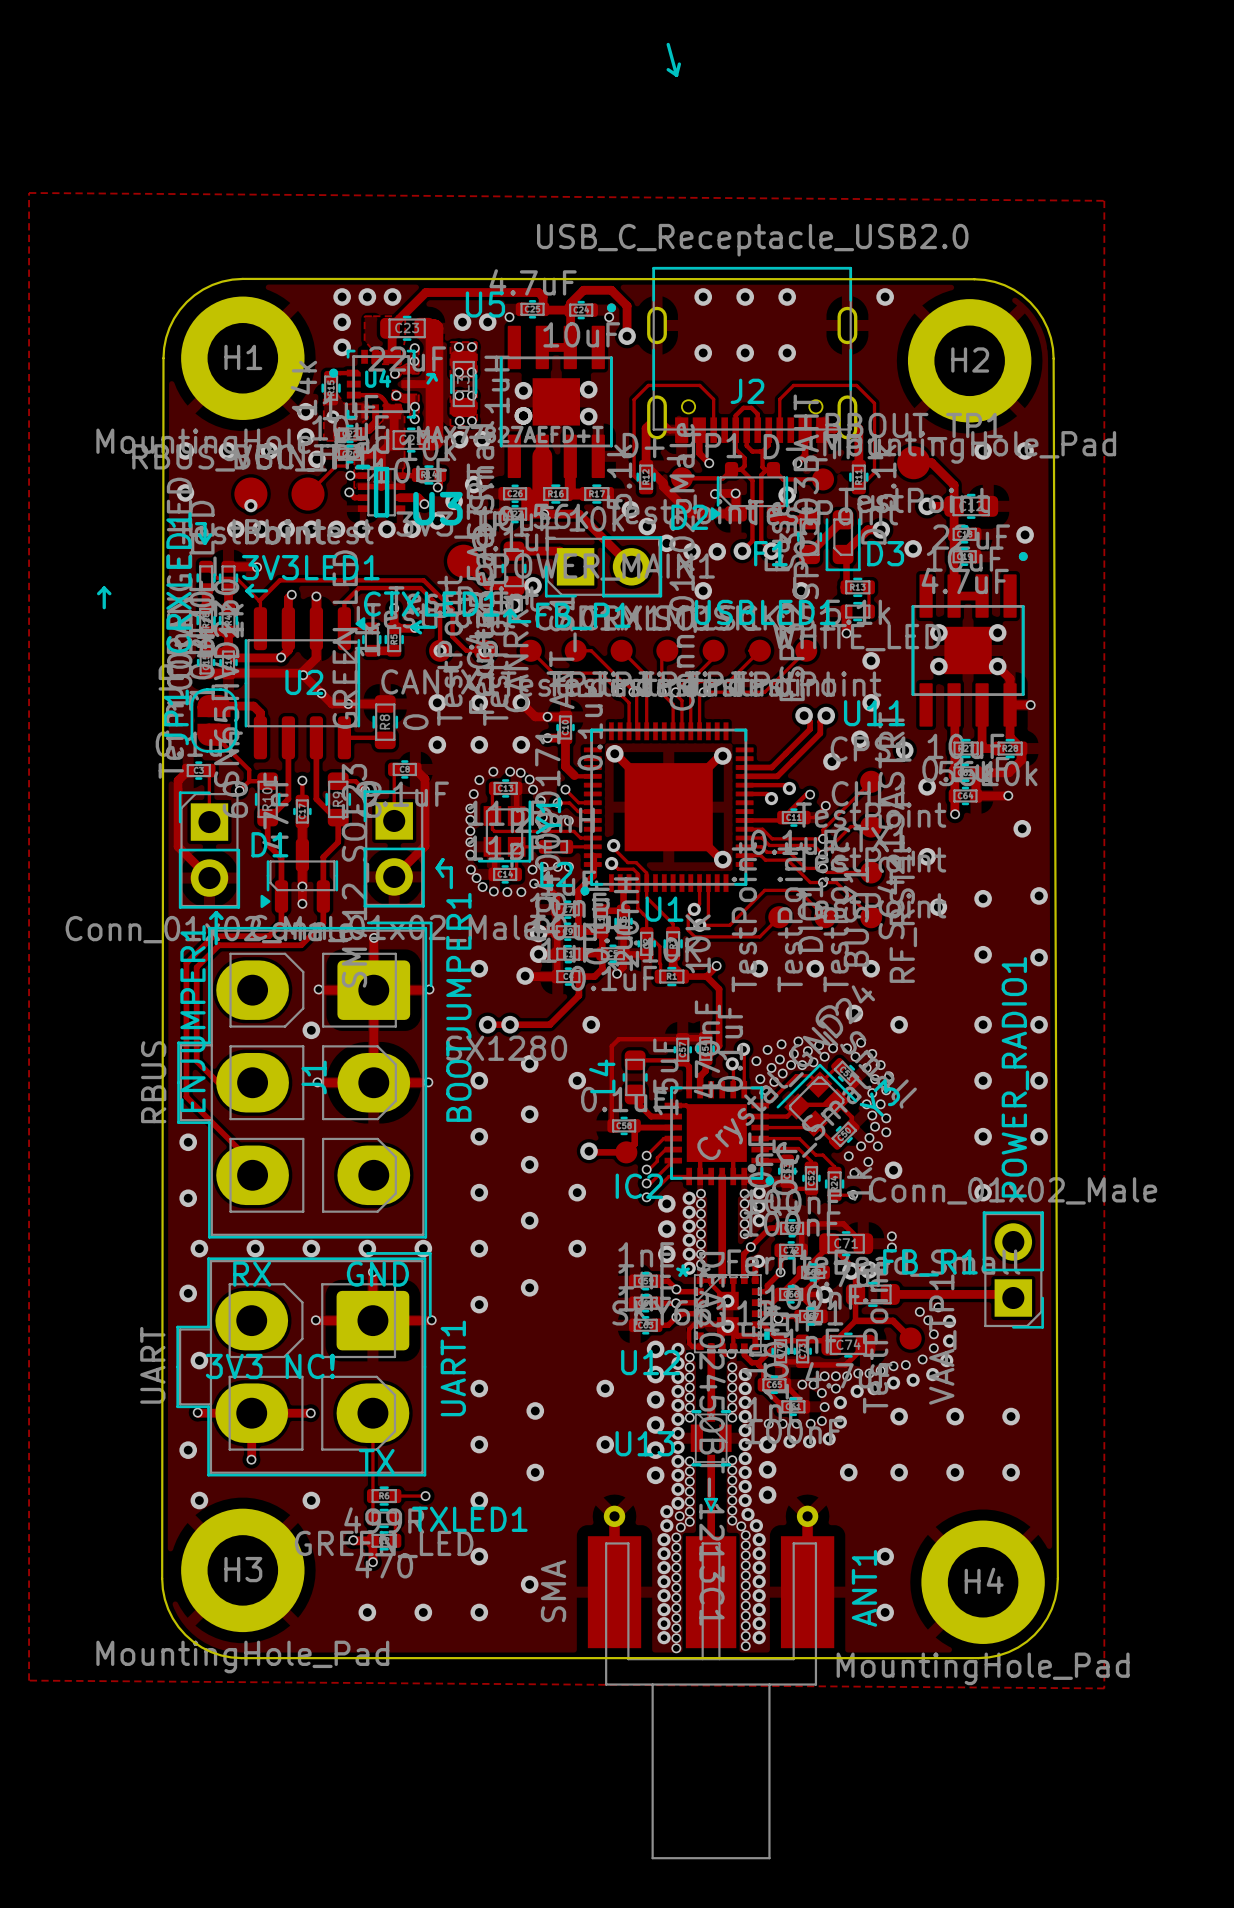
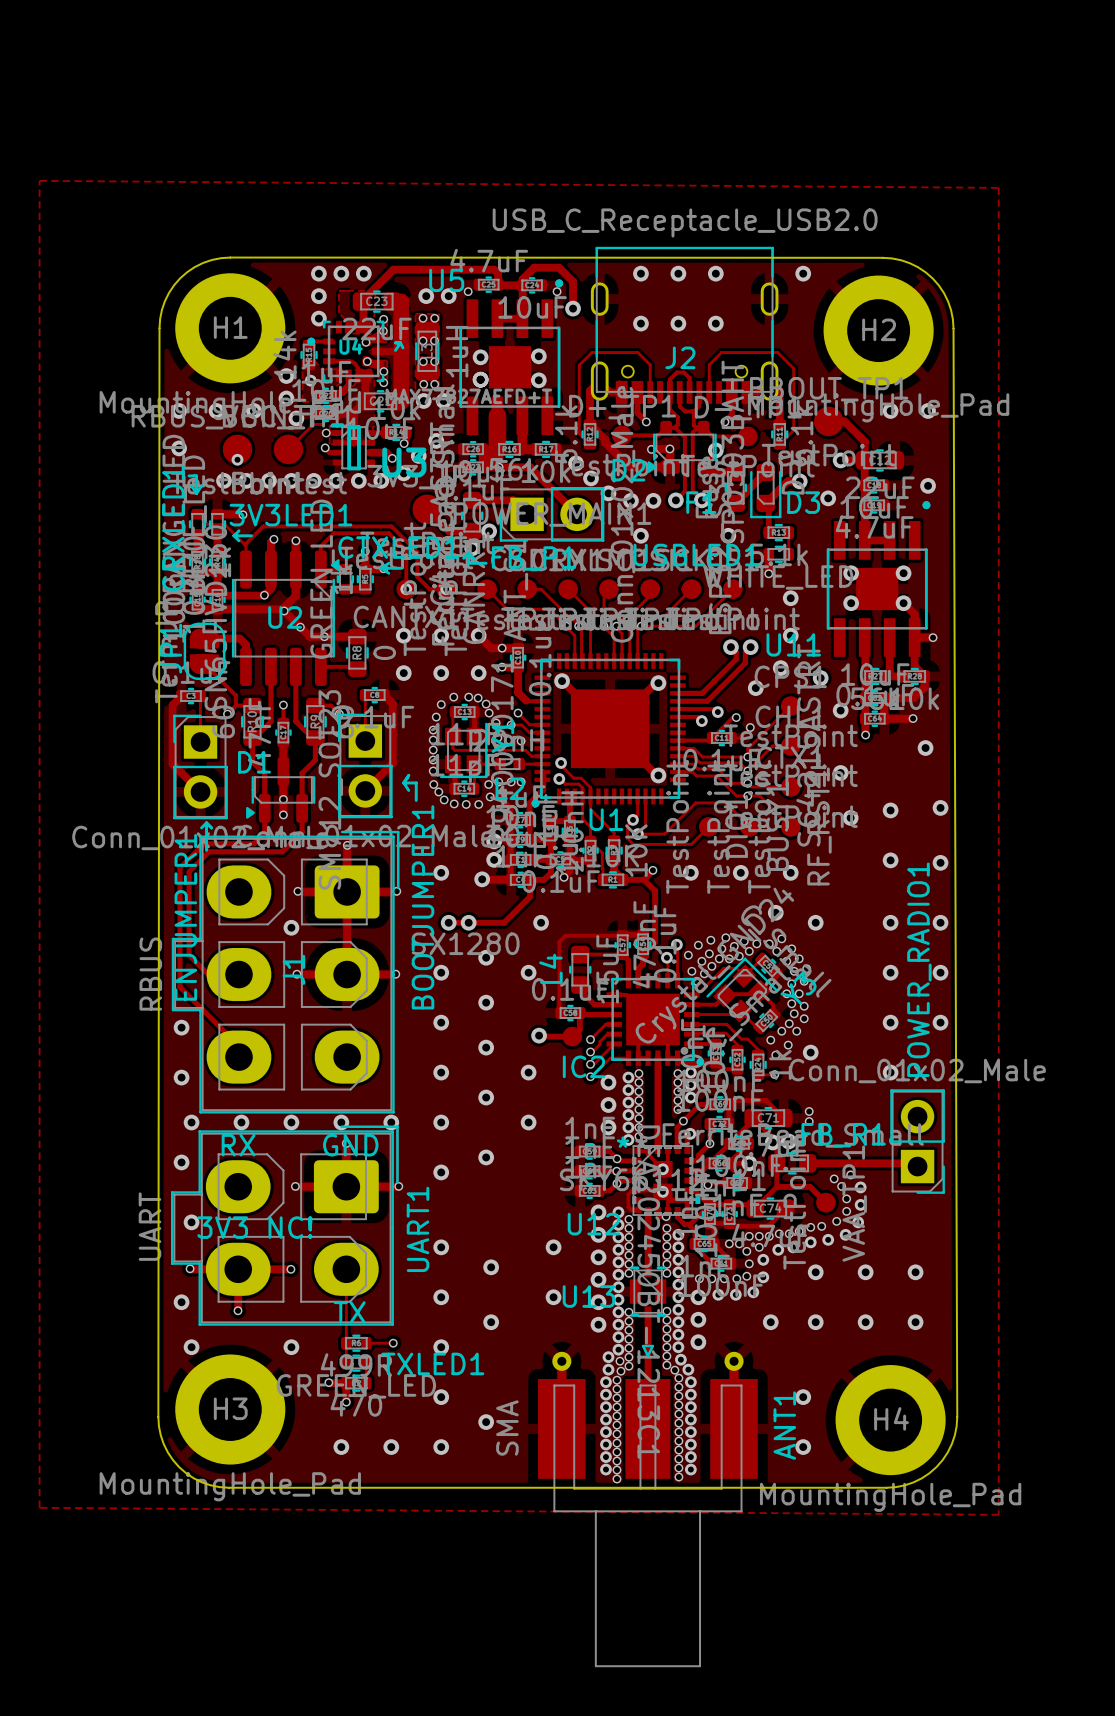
line: (668, 44) (676, 75) -> none
line: (679, 64) (676, 75) -> none
line: (668, 69) (676, 75) -> none
line: (104, 588) (109, 593) -> none
line: (104, 588) (104, 607) -> none
line: (104, 588) (98, 593) -> none

